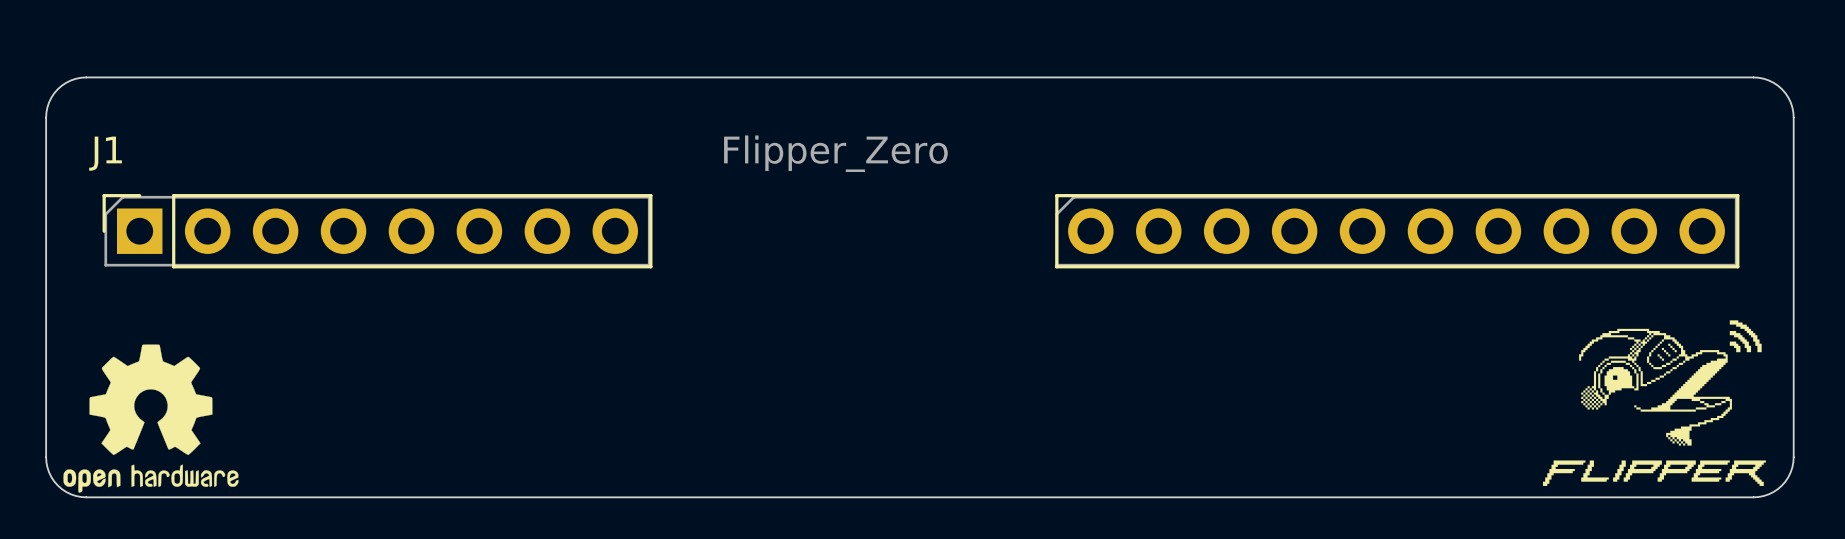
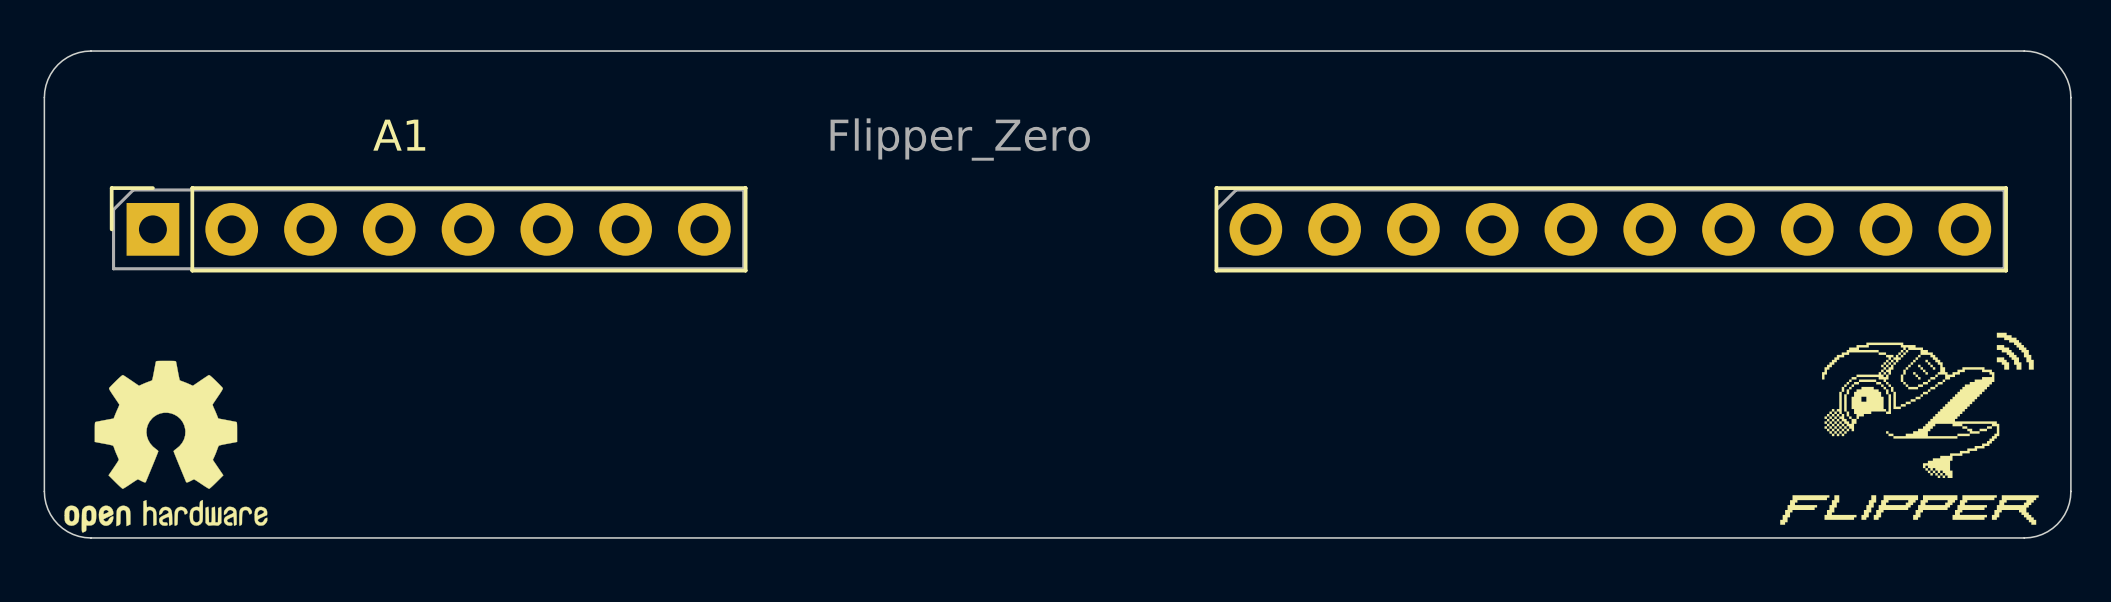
J1: Flipper_Zero (920, 231) -> none
A1: none -> Flipper_Zero (1058, 229)

